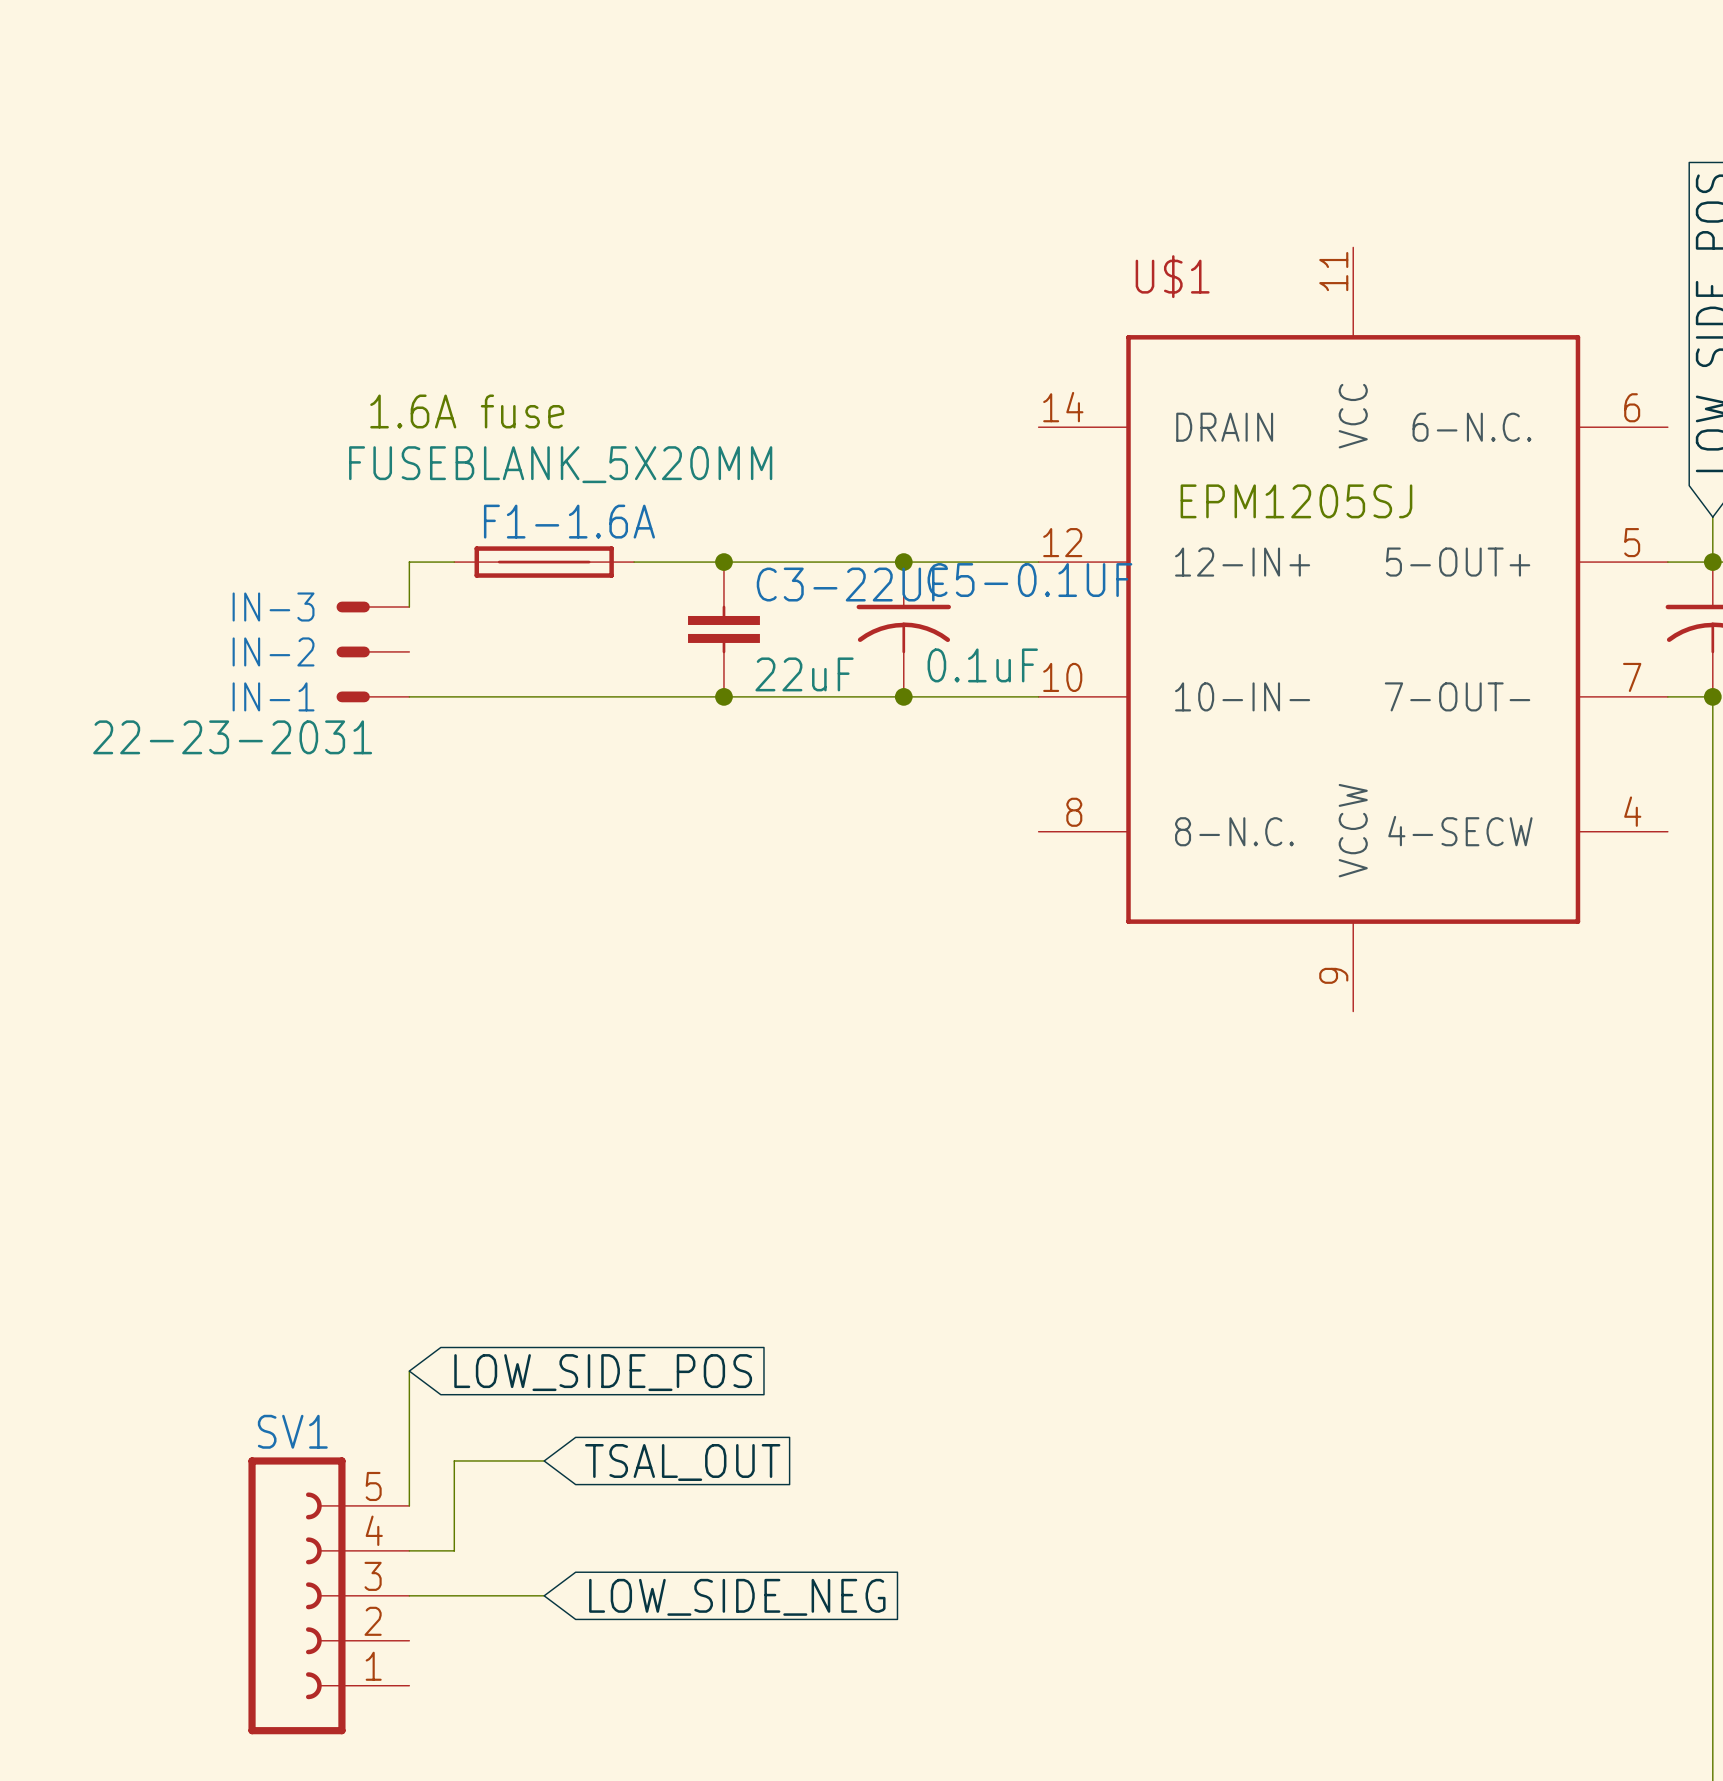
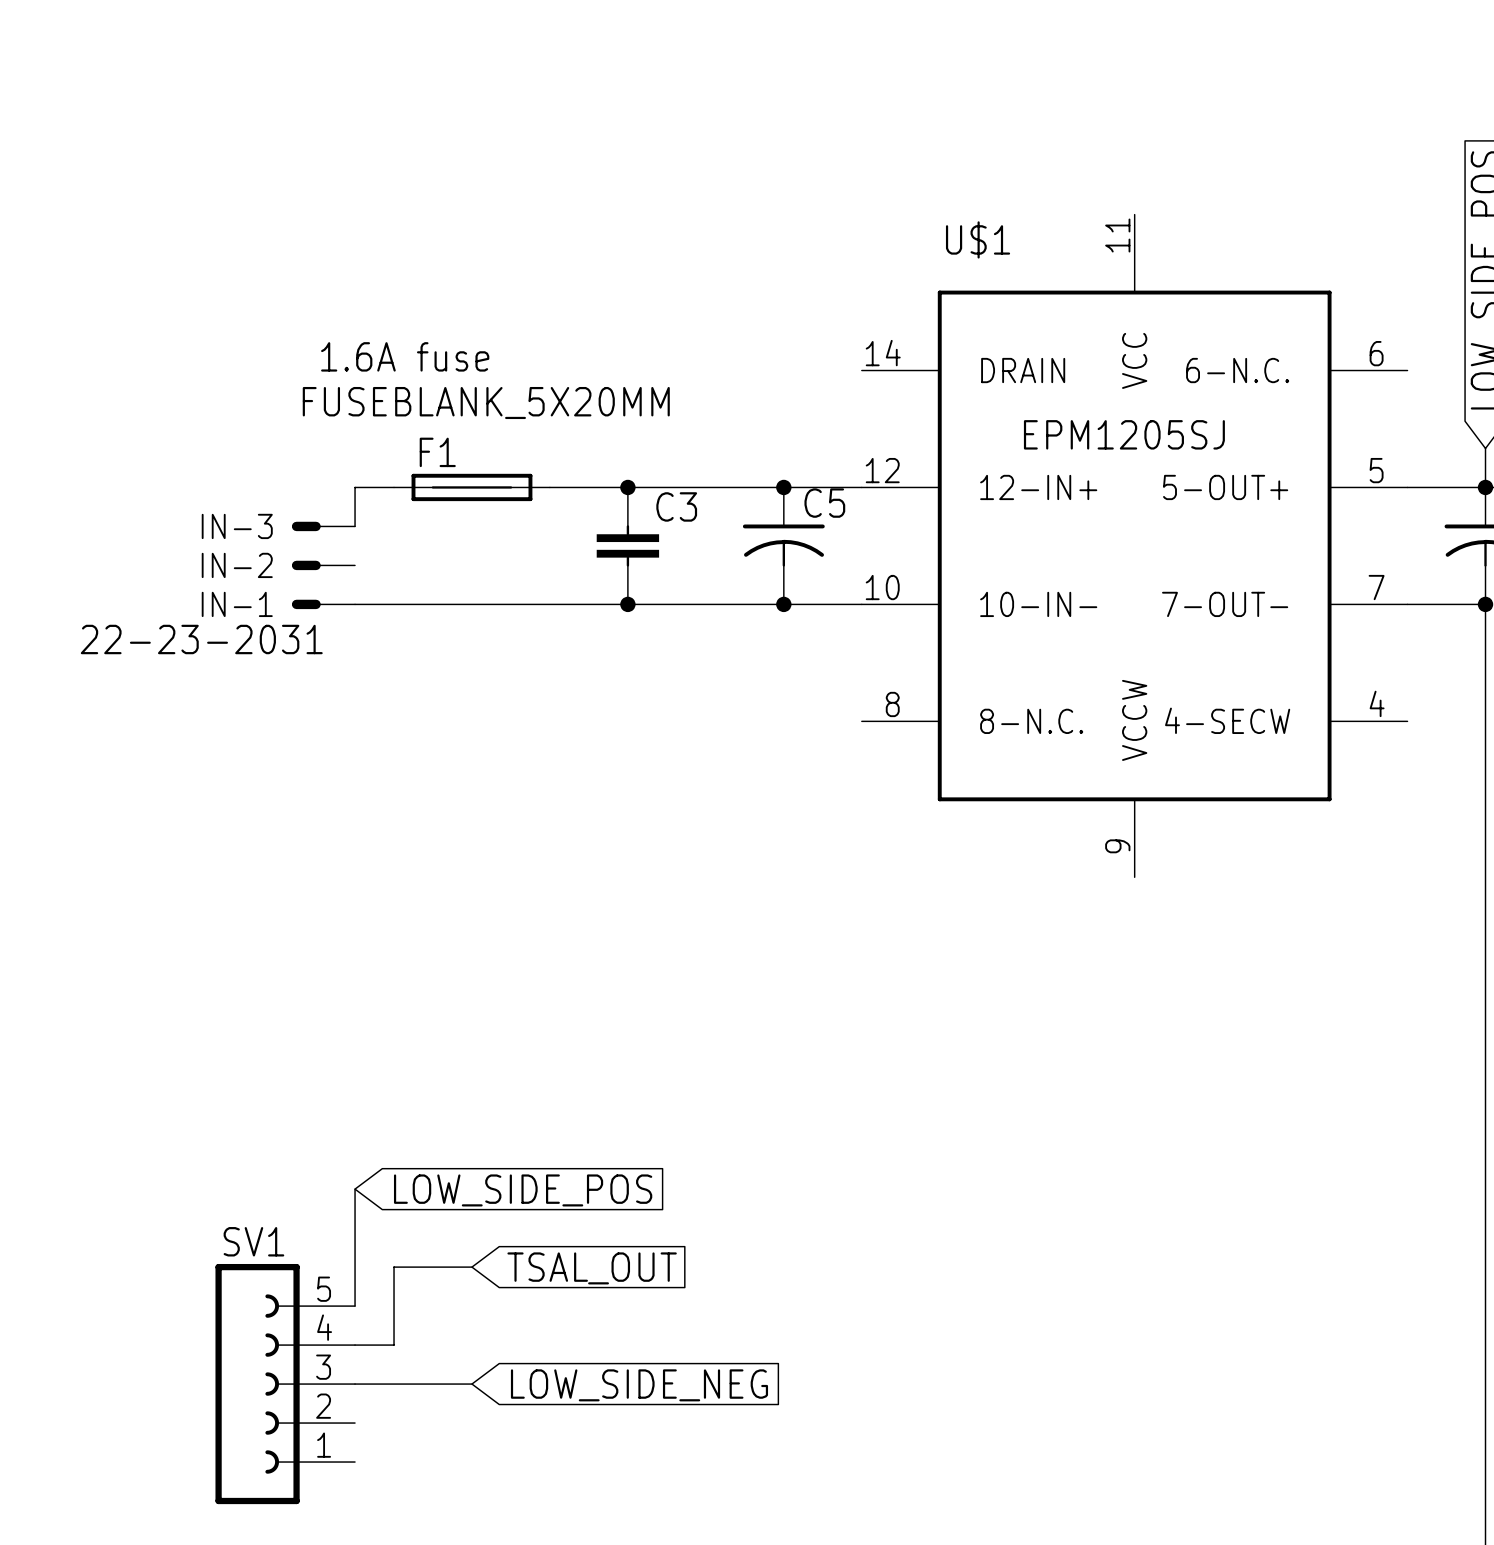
F1-1.6A name: F1-1.6A (569, 521) -> F1 (437, 452)
C5-0.1UF name: C5-0.1UF (1029, 580) -> C5 (824, 503)
C3-22UF name: C3-22UF (852, 584) -> C3 (676, 506)
U$1 position: (1353, 629) -> (1134, 545)
C5-0.1UF value: 0.1uF (982, 665) -> none
C3-22UF value: 22uF (804, 674) -> none

